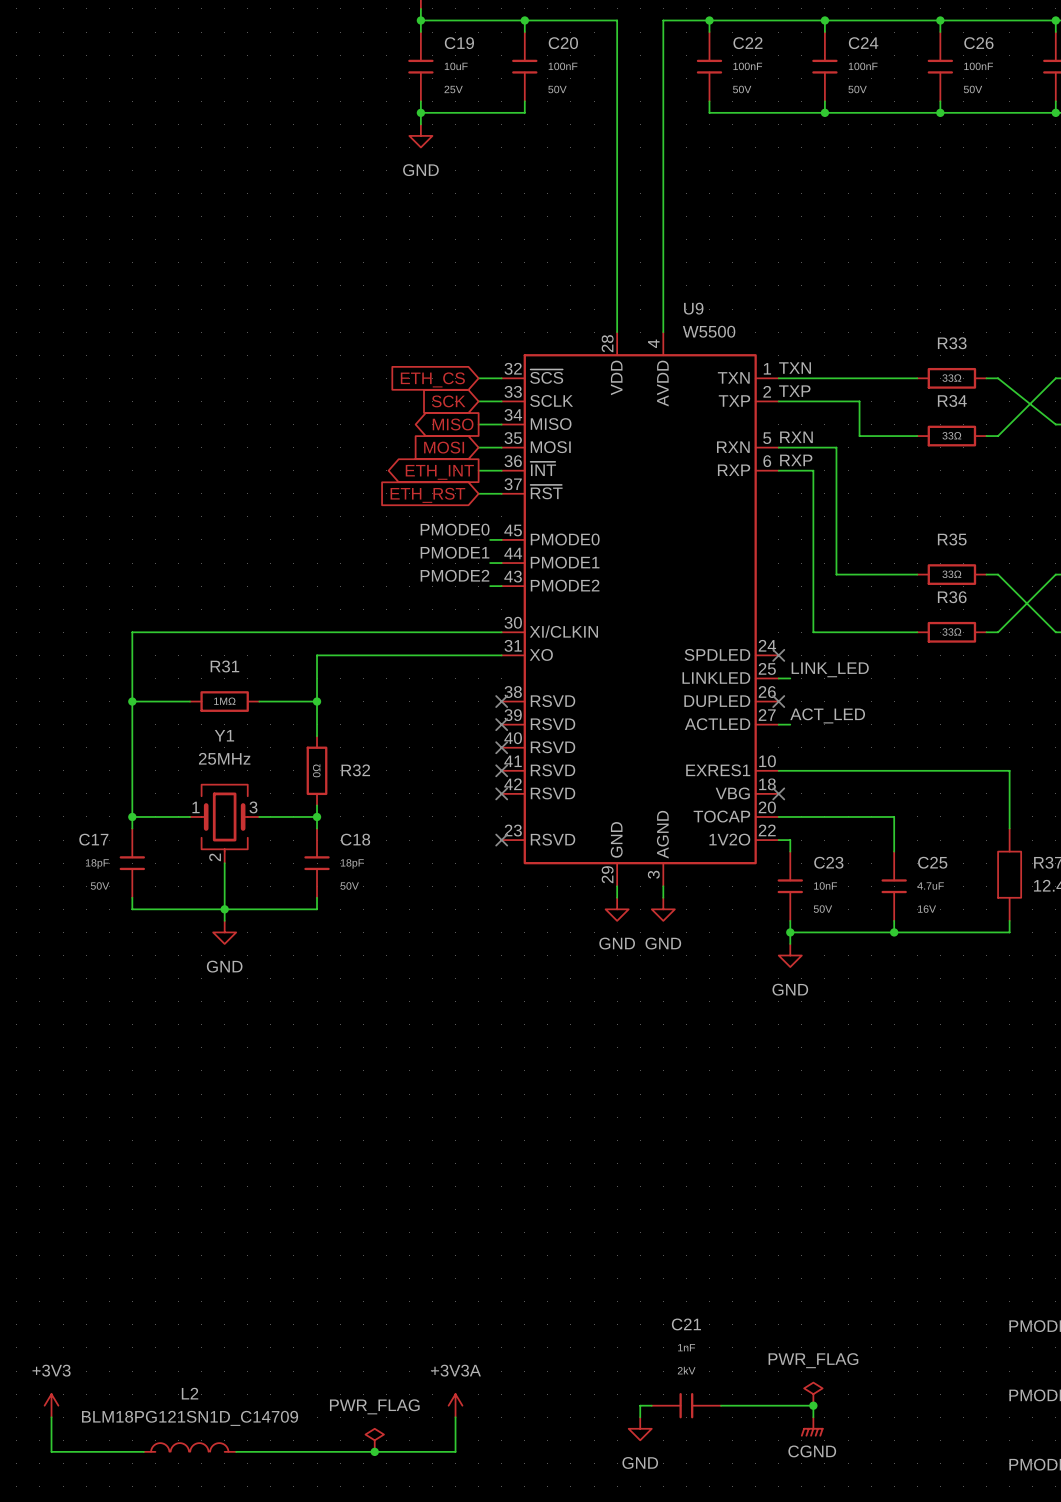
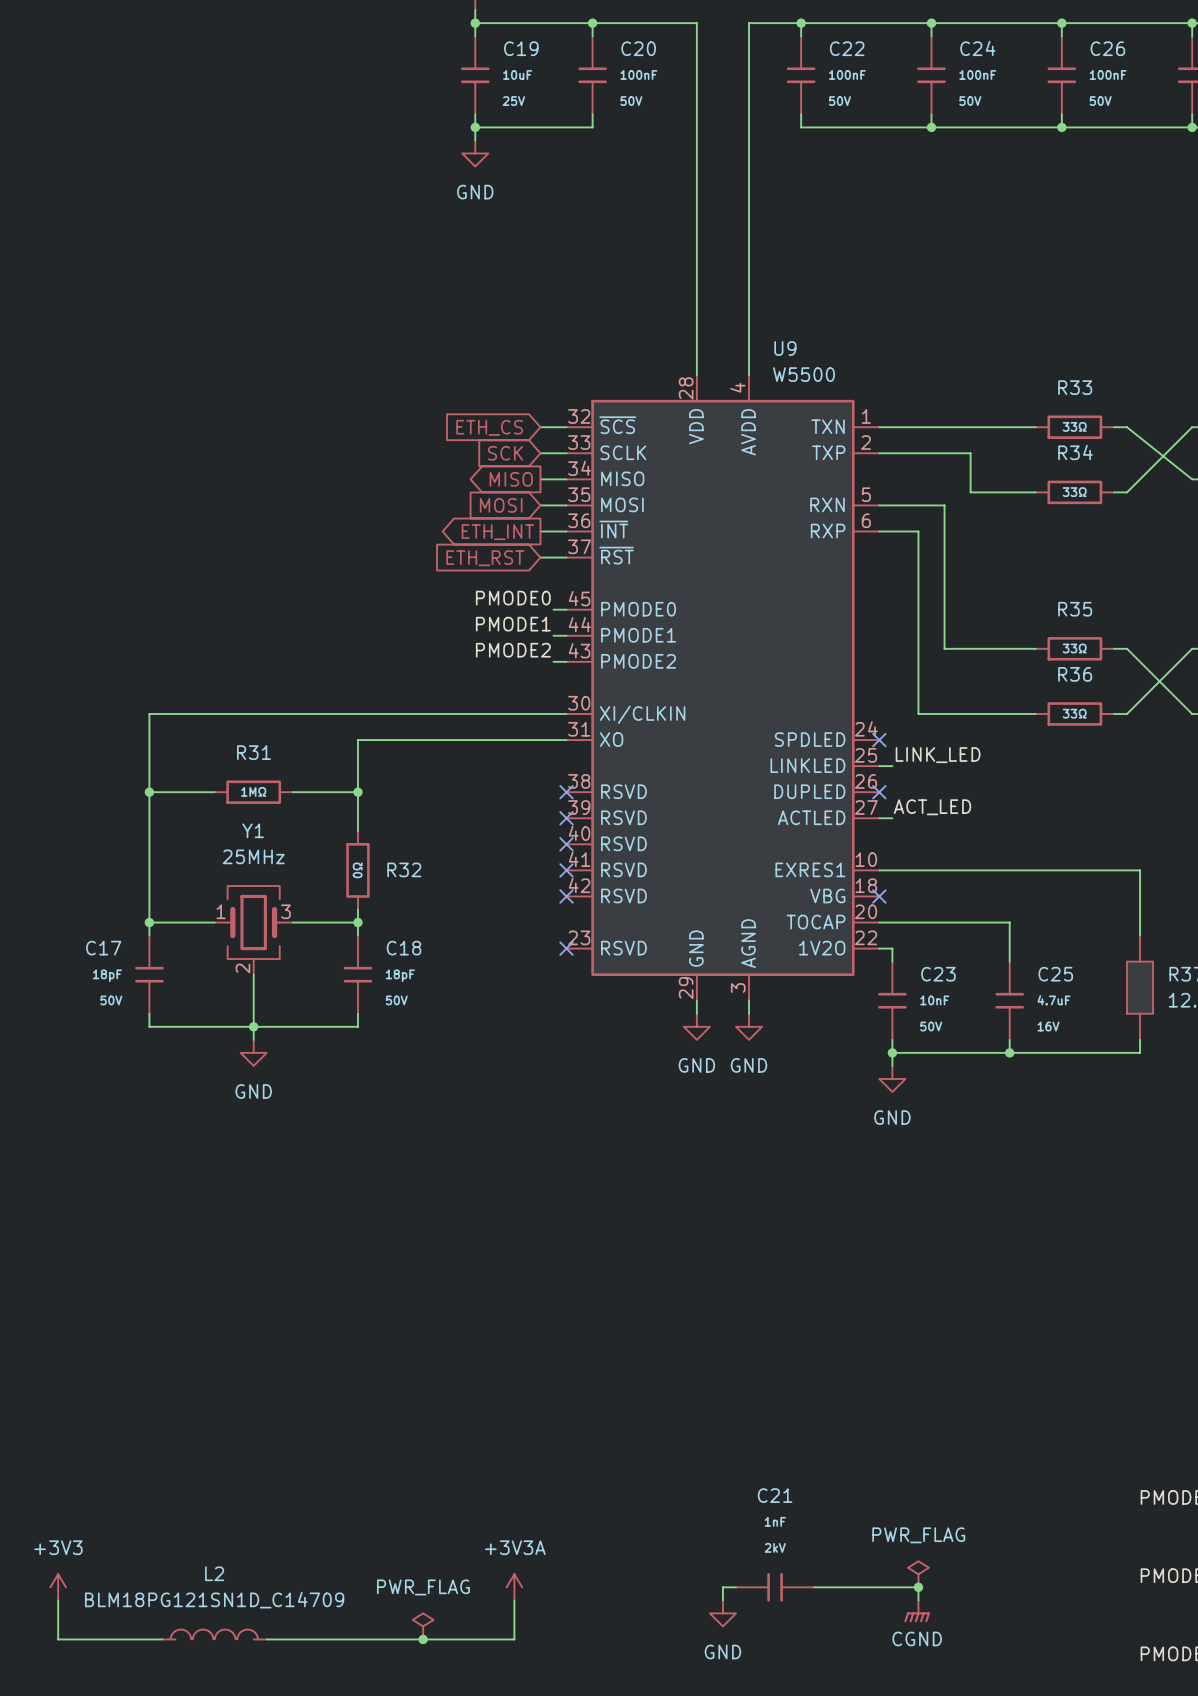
label: TXN (795, 368) -> none
label: TXP (794, 391) -> none
label: RXN (796, 437) -> none
label: RXP (796, 460) -> none

